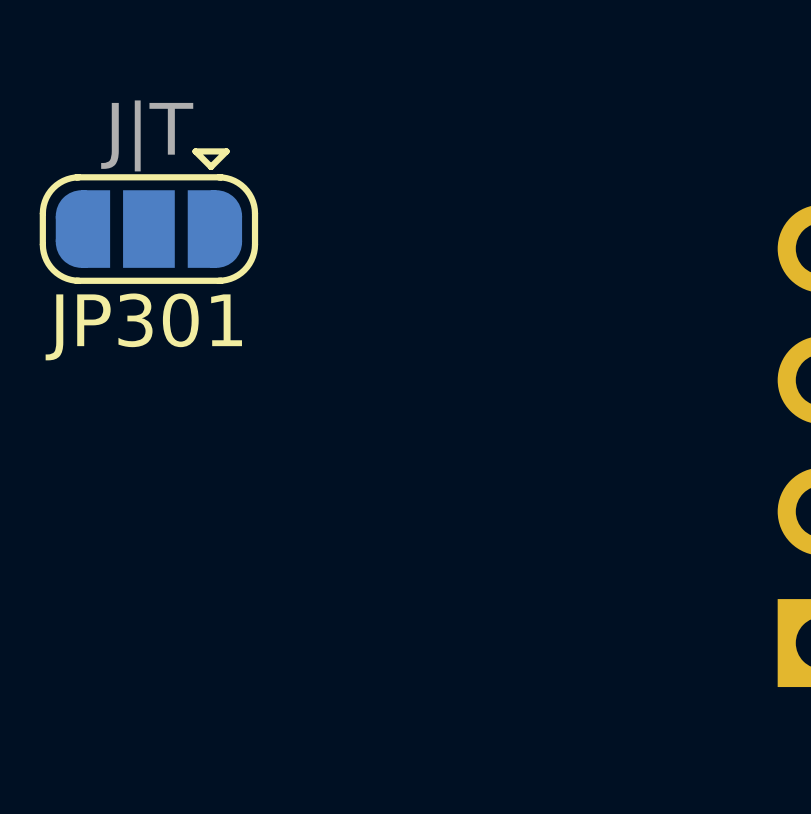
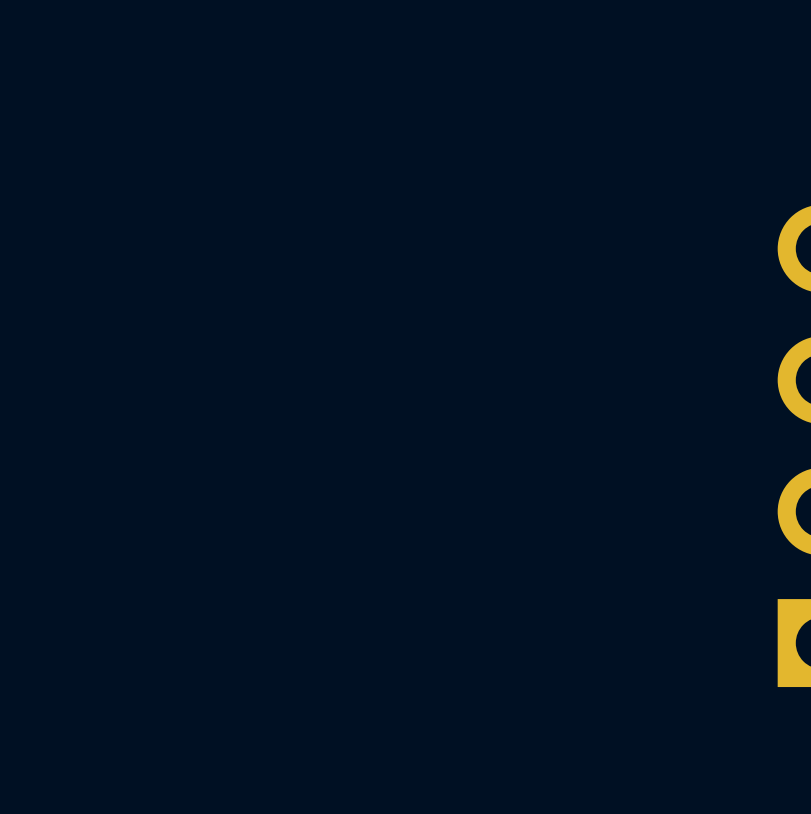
JP301: J|T (148, 216) -> none

